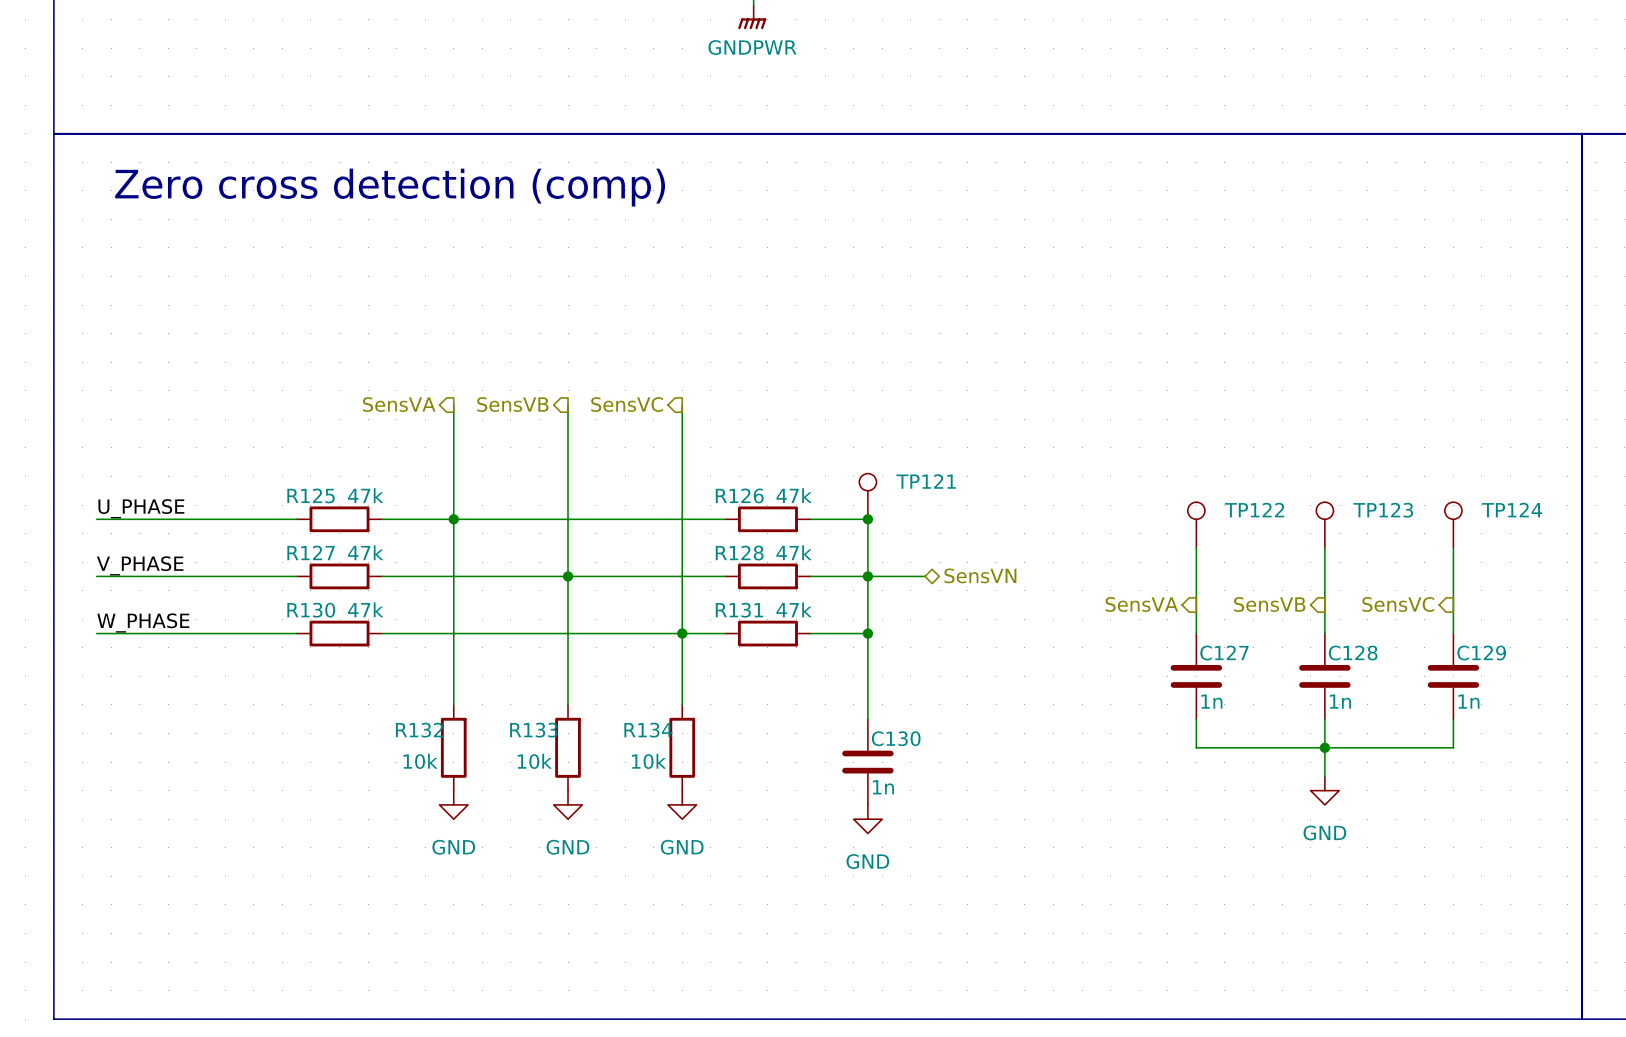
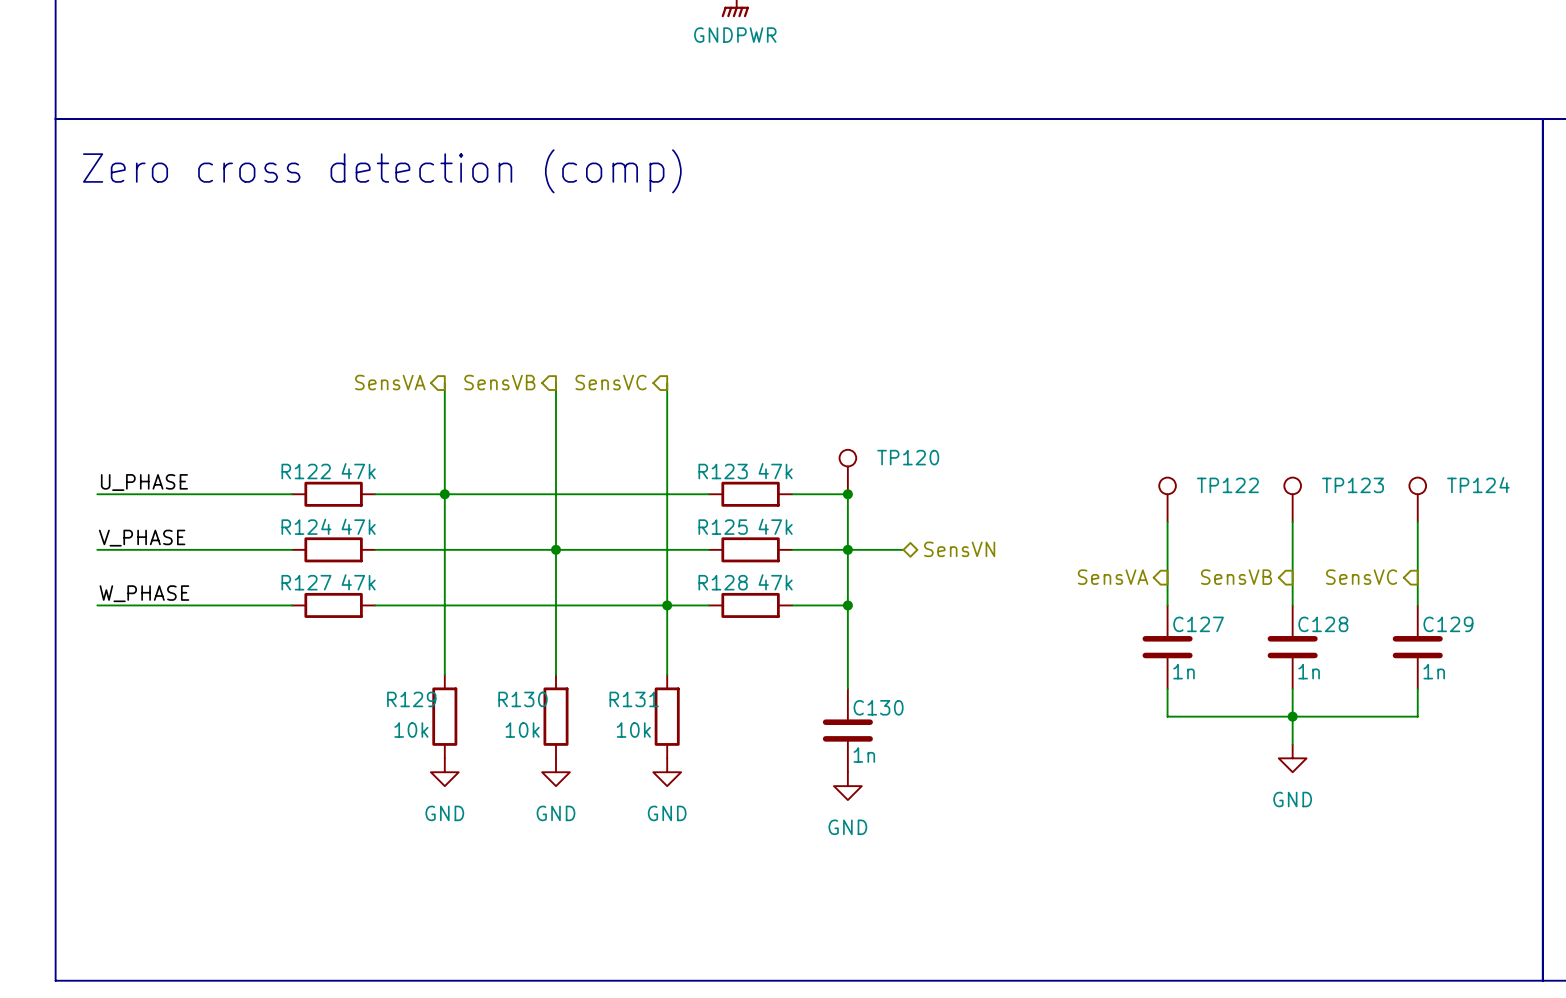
TP121 name: TP121 (926, 481) -> TP120 (908, 457)
R125 name: R125 (311, 495) -> R122 (306, 471)
R126 name: R126 (739, 495) -> R123 (723, 471)
R127 name: R127 (311, 552) -> R124 (306, 526)
R128 name: R128 (739, 553) -> R125 (723, 527)
R130 name: R130 (311, 610) -> R127 (306, 582)
R131 name: R131 (739, 610) -> R128 (723, 582)
R132 name: R132 (419, 730) -> R129 (411, 699)
R133 name: R133 (533, 730) -> R130 (522, 699)
R134 name: R134 (648, 730) -> R131 (634, 699)

